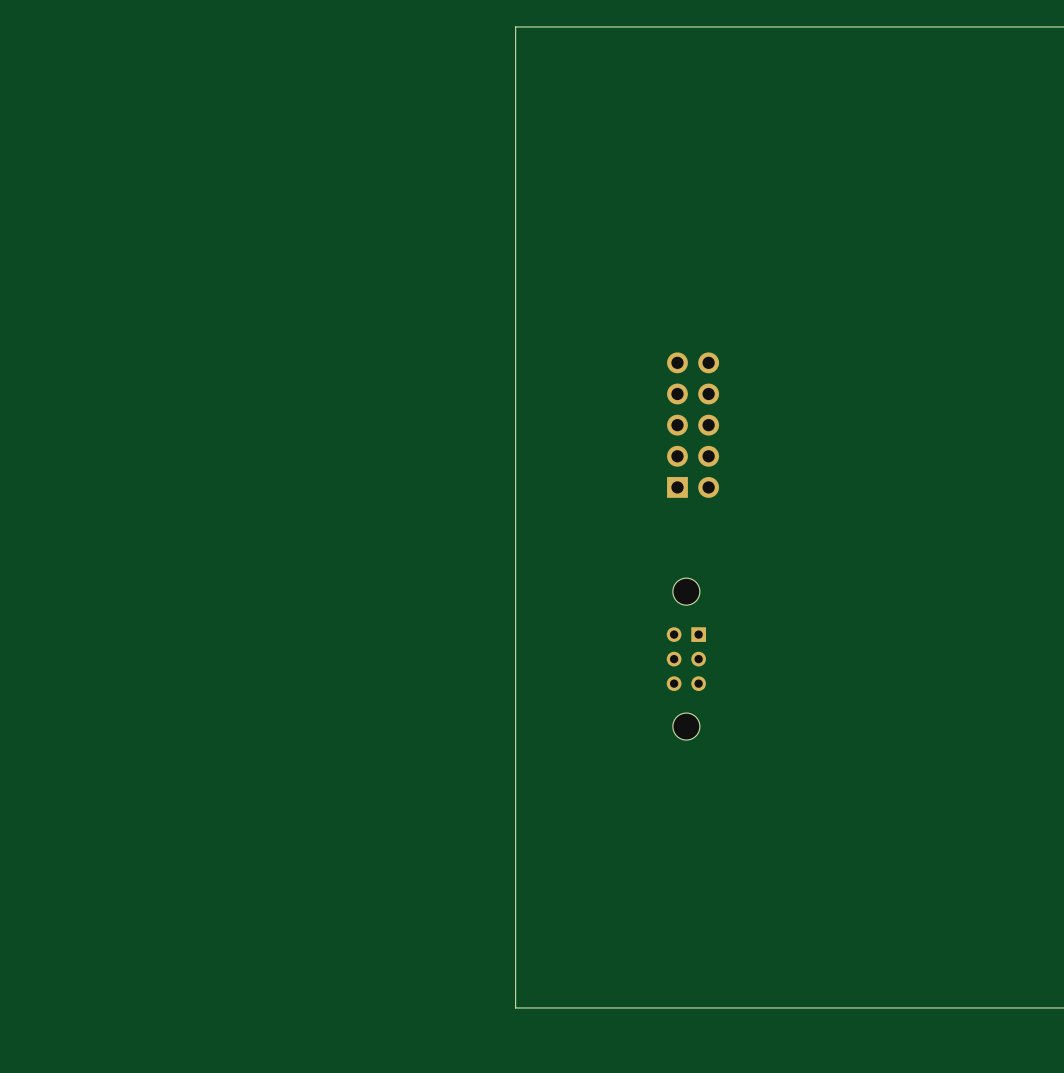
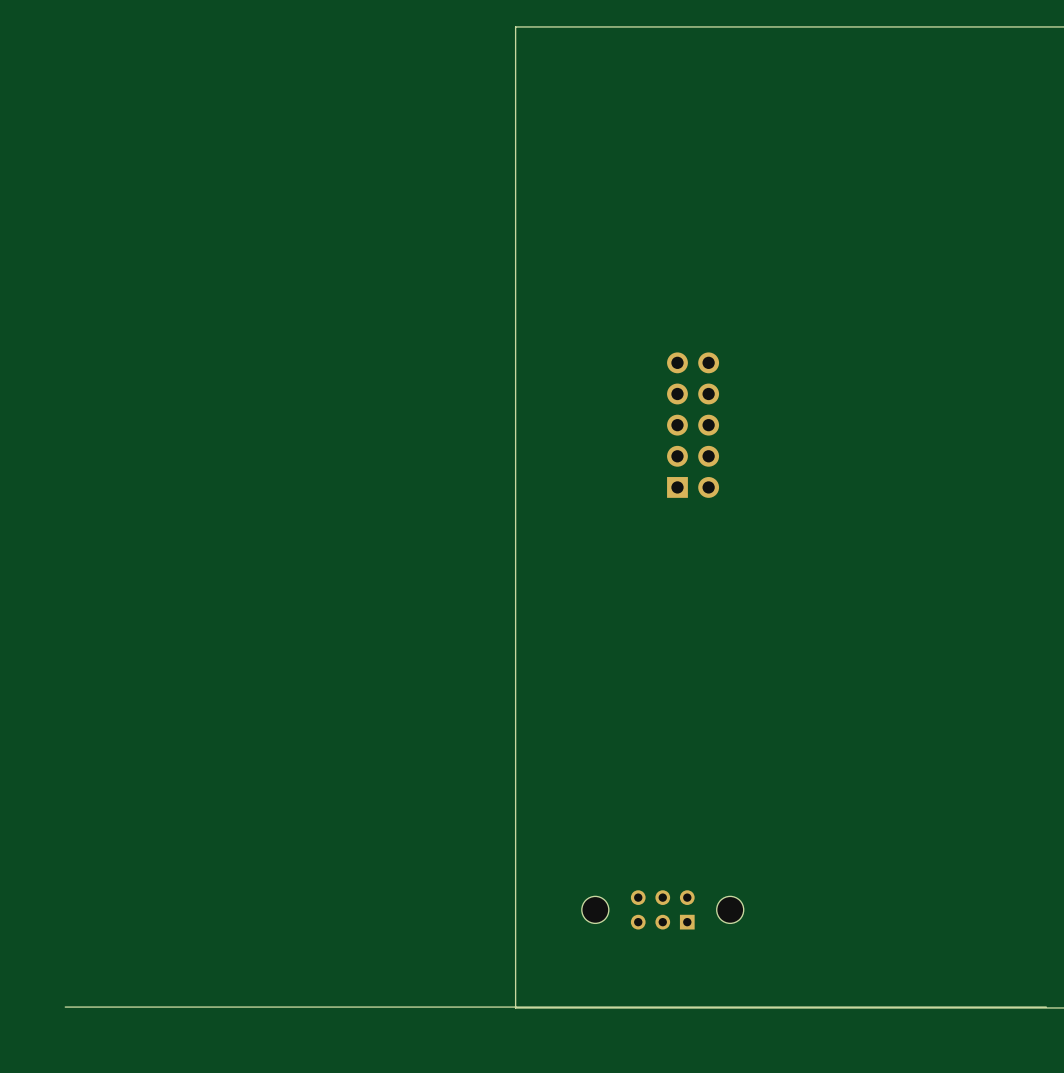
part rotation: 0° (686, 659) -> 90° clockwise (662, 909)
part position: (686, 659) -> (662, 909)
board edge: none -> (1046, 1007) (65, 1007)

